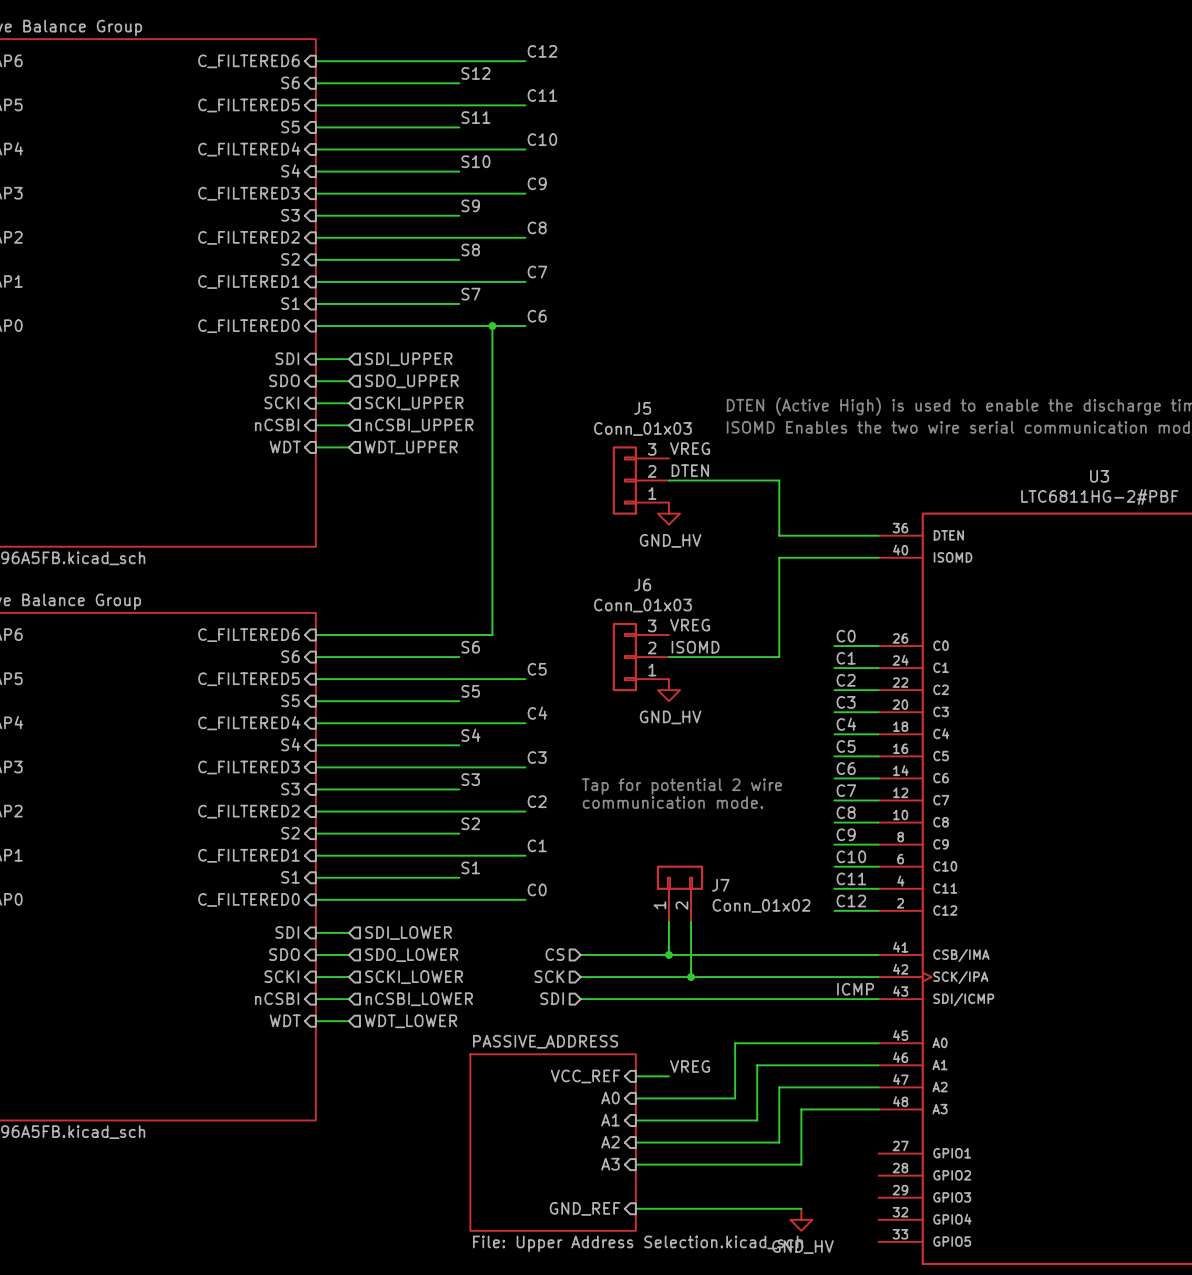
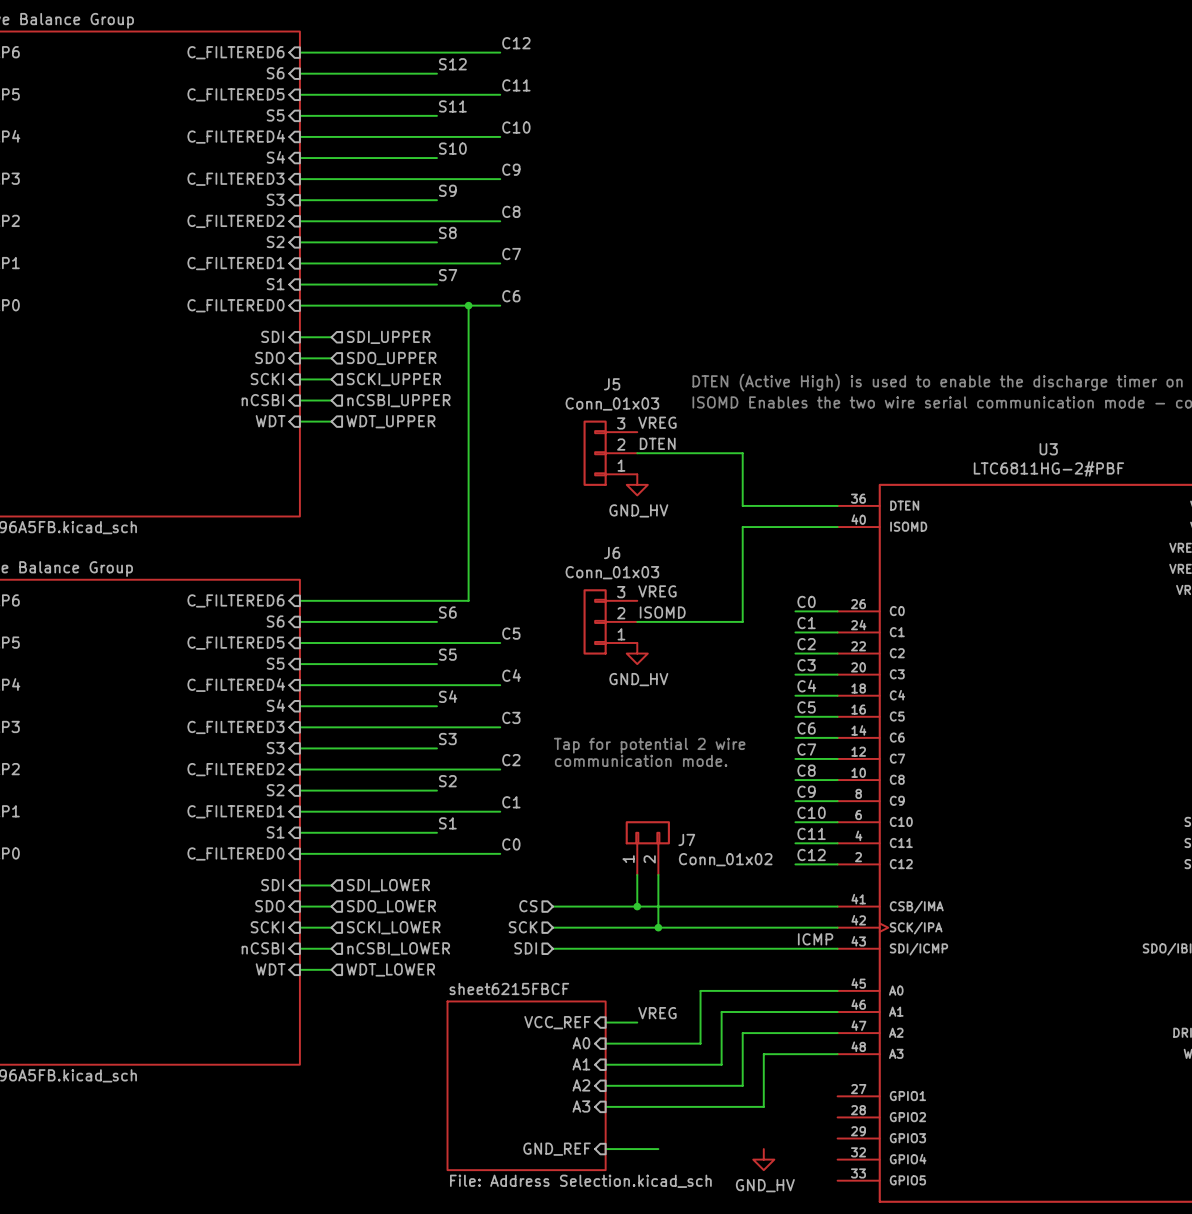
sheet PASSIVE_ADDRESS name: PASSIVE_ADDRESS (545, 1041) -> sheet6215FBCF (509, 988)
wire: (691, 1208) (801, 1208) -> none
sheet PASSIVE_ADDRESS value: File: Upper Address Selection.kicad_sch (638, 1243) -> File: Address Selection.kicad_sch (580, 1181)

